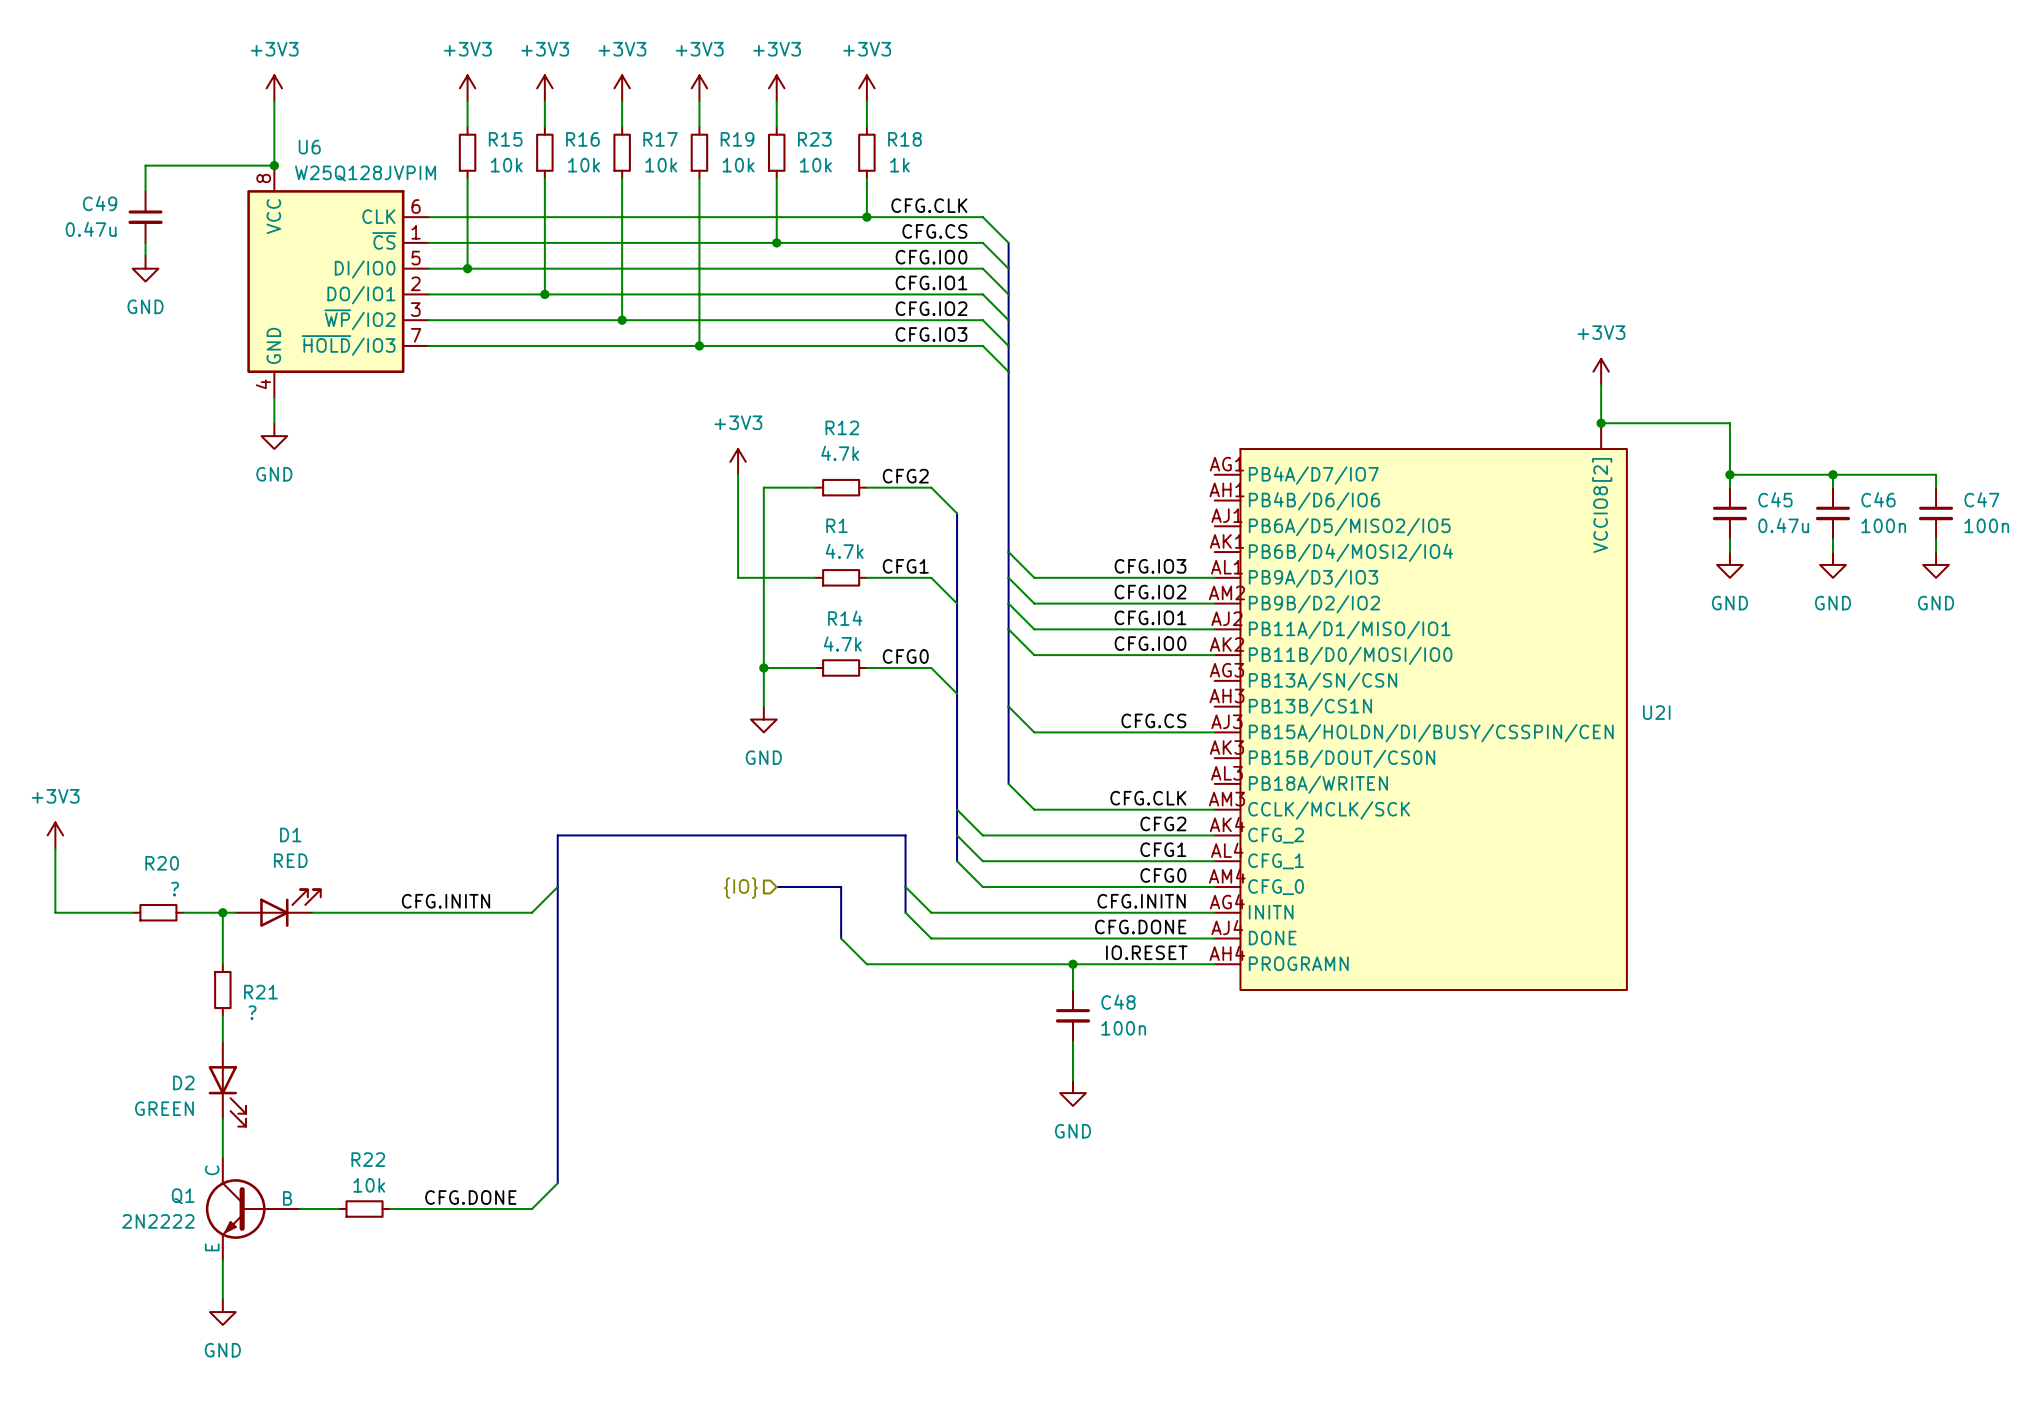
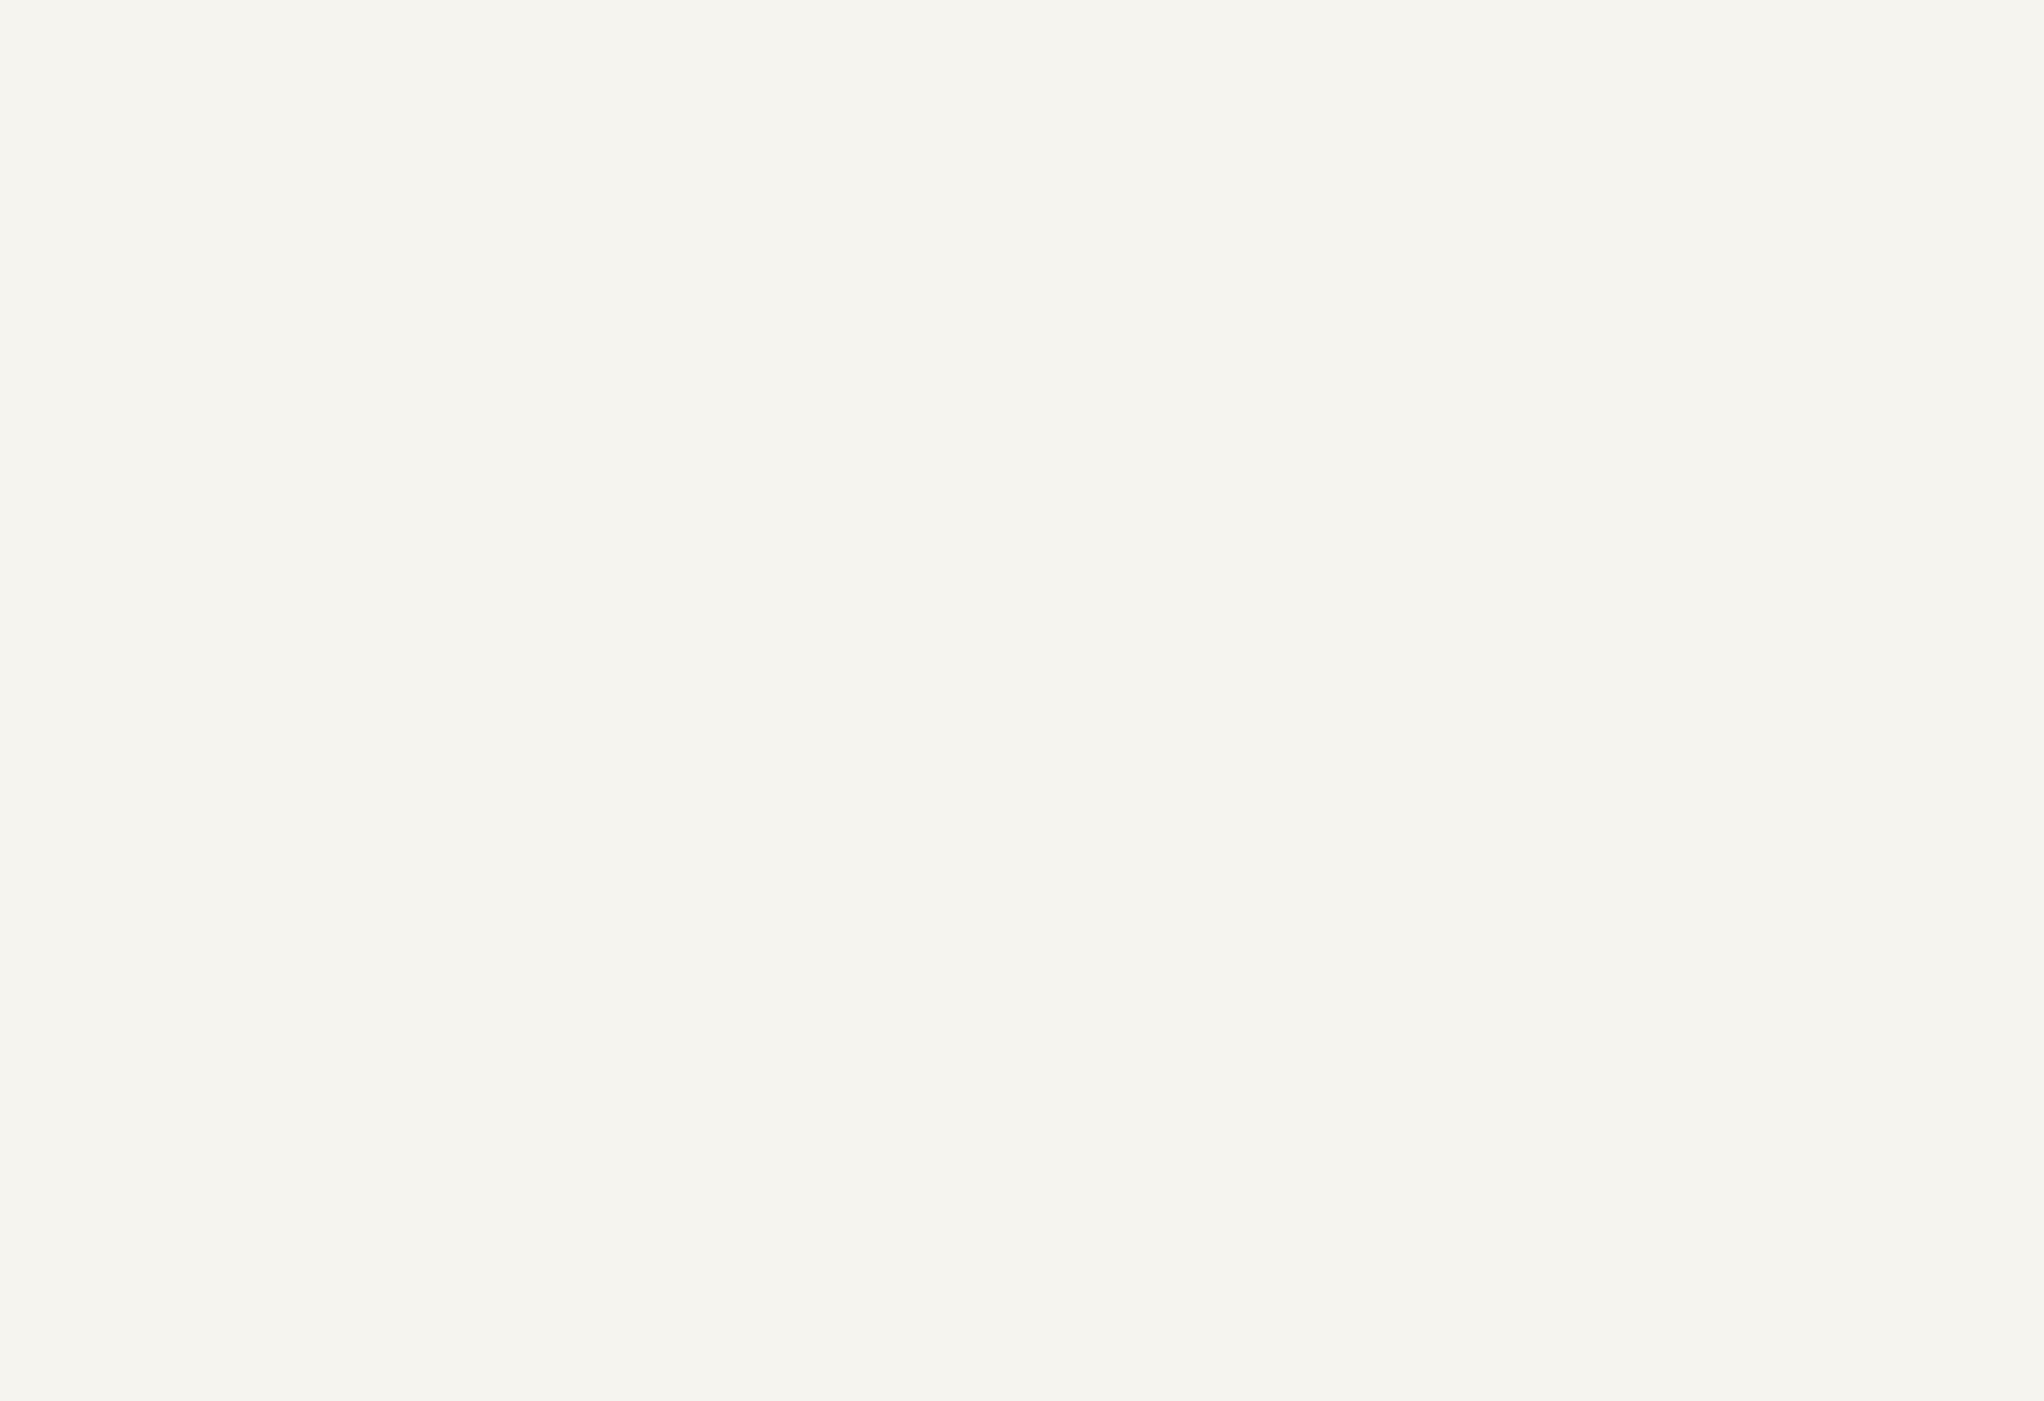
power symbol: +3V3 (274, 88) -> none
power symbol: +3V3 (467, 88) -> none
power symbol: +3V3 (544, 88) -> none
power symbol: +3V3 (622, 88) -> none
power symbol: +3V3 (699, 88) -> none
power symbol: +3V3 (776, 88) -> none
power symbol: +3V3 (866, 88) -> none
wire: (274, 101) (274, 165) (145, 165) (145, 191) -> none
wire: (467, 101) (467, 126) -> none
wire: (544, 101) (544, 126) -> none
wire: (622, 101) (622, 126) -> none
wire: (699, 101) (699, 126) -> none
wire: (776, 101) (776, 126) -> none
wire: (866, 101) (866, 126) -> none
R15: 10k (467, 152) -> none
R16: 10k (544, 152) -> none
R17: 10k (622, 152) -> none
R19: 10k (699, 152) -> none
R23: 10k (776, 152) -> none
R18: 1k (866, 152) -> none
junction: (274, 165) -> none
wire: (467, 178) (467, 268) -> none
wire: (544, 178) (544, 294) -> none
wire: (622, 178) (622, 320) -> none
wire: (699, 178) (699, 345) -> none
wire: (776, 178) (776, 242) -> none
wire: (866, 178) (866, 217) -> none
label: CFG.CLK (929, 205) -> none
C49: 0.47u (145, 217) -> none
wire: (428, 217) (982, 217) (1008, 242) -> none
junction: (866, 217) -> none
label: CFG.CS (934, 231) -> none
wire: (145, 242) (145, 255) -> none
wire: (428, 242) (982, 242) (1008, 268) -> none
junction: (776, 242) -> none
bus: (1008, 242) (1008, 783) -> none
label: CFG.IO0 (931, 257) -> none
power symbol: GND (145, 268) -> none
wire: (428, 268) (982, 268) (1008, 294) -> none
junction: (467, 268) -> none
U6: W25Q128JVPIM (338, 281) -> none
label: CFG.IO1 (931, 282) -> none
wire: (428, 294) (982, 294) (1008, 320) -> none
junction: (544, 294) -> none
label: CFG.IO2 (931, 308) -> none
wire: (428, 320) (982, 320) (1008, 345) -> none
junction: (622, 320) -> none
label: CFG.IO3 (931, 334) -> none
wire: (428, 345) (982, 345) (1008, 371) -> none
junction: (699, 345) -> none
power symbol: +3V3 (1601, 371) -> none
wire: (1601, 384) (1601, 423) (1729, 423) (1729, 487) -> none
wire: (274, 397) (274, 423) -> none
junction: (1601, 423) -> none
power symbol: GND (274, 436) -> none
power symbol: +3V3 (738, 461) -> none
wire: (738, 474) (738, 577) (815, 577) -> none
wire: (1729, 474) (1936, 474) (1936, 487) -> none
junction: (1729, 474) -> none
wire: (1833, 474) (1833, 487) -> none
junction: (1833, 474) -> none
label: CFG2 (905, 476) -> none
wire: (815, 487) (763, 487) (763, 706) -> none
R12: 4.7k (841, 487) -> none
wire: (866, 487) (931, 487) (957, 513) -> none
bus: (957, 513) (957, 861) -> none
C45: 0.47u (1729, 513) -> none
C46: 100n (1833, 513) -> none
C47: 100n (1936, 513) -> none
wire: (1729, 539) (1729, 552) -> none
wire: (1833, 539) (1833, 552) -> none
wire: (1936, 539) (1936, 552) -> none
wire: (1008, 552) (1034, 577) (1214, 577) -> none
power symbol: GND (1729, 564) -> none
power symbol: GND (1833, 564) -> none
power symbol: GND (1936, 564) -> none
label: CFG1 (905, 566) -> none
label: CFG.IO3 (1150, 566) -> none
R1: 4.7k (841, 577) -> none
wire: (866, 577) (931, 577) (957, 603) -> none
wire: (1008, 577) (1034, 603) (1214, 603) -> none
label: CFG.IO2 (1150, 592) -> none
wire: (1008, 603) (1034, 629) (1214, 629) -> none
label: CFG.IO1 (1150, 617) -> none
wire: (1008, 629) (1034, 655) (1214, 655) -> none
label: CFG.IO0 (1150, 643) -> none
label: CFG0 (905, 656) -> none
wire: (763, 667) (815, 667) -> none
junction: (763, 667) -> none
R14: 4.7k (841, 667) -> none
wire: (866, 667) (931, 667) (957, 693) -> none
wire: (1008, 706) (1034, 732) (1214, 732) -> none
U2I: (1420, 706) -> none
power symbol: GND (763, 719) -> none
label: CFG.CS (1153, 720) -> none
wire: (1008, 783) (1034, 809) (1214, 809) -> none
label: CFG.CLK (1148, 798) -> none
wire: (957, 809) (982, 835) (1214, 835) -> none
label: CFG2 (1163, 823) -> none
power symbol: +3V3 (55, 835) -> none
wire: (957, 835) (982, 861) (1214, 861) -> none
wire: (55, 848) (55, 912) (132, 912) -> none
label: CFG1 (1163, 849) -> none
wire: (957, 861) (982, 886) (1214, 886) -> none
label: CFG0 (1163, 875) -> none
wire: (557, 886) (531, 912) (313, 912) -> none
bus: (776, 886) (841, 886) (841, 938) -> none
wire: (905, 886) (931, 912) (1214, 912) -> none
hierarchical label: {IO} (740, 888) -> none
label: CFG.INITN (446, 901) -> none
label: CFG.INITN (1141, 901) -> none
D1: RED (278, 908) -> none
R20: ? (158, 912) -> none
wire: (184, 912) (235, 912) -> none
wire: (222, 912) (222, 964) -> none
junction: (222, 912) -> none
wire: (905, 912) (931, 938) (1214, 938) -> none
bus: (905, 912) (905, 835) (557, 835) (557, 1183) -> none
label: CFG.DONE (1140, 927) -> none
wire: (841, 938) (866, 964) (1214, 964) -> none
label: IO.RESET (1146, 952) -> none
wire: (1073, 964) (1073, 990) -> none
junction: (1073, 964) -> none
R21: ? (222, 990) -> none
wire: (222, 1015) (222, 1041) -> none
C48: 100n (1073, 1015) -> none
wire: (1073, 1041) (1073, 1080) -> none
D2: GREEN (227, 1084) -> none
power symbol: GND (1073, 1093) -> none
wire: (222, 1118) (222, 1157) -> none
wire: (557, 1183) (531, 1209) (390, 1209) -> none
label: CFG.DONE (470, 1197) -> none
Q1: 2N2222 (252, 1209) -> none
wire: (300, 1209) (338, 1209) -> none
R22: 10k (364, 1209) -> none
wire: (222, 1260) (222, 1299) -> none
power symbol: GND (222, 1312) -> none

